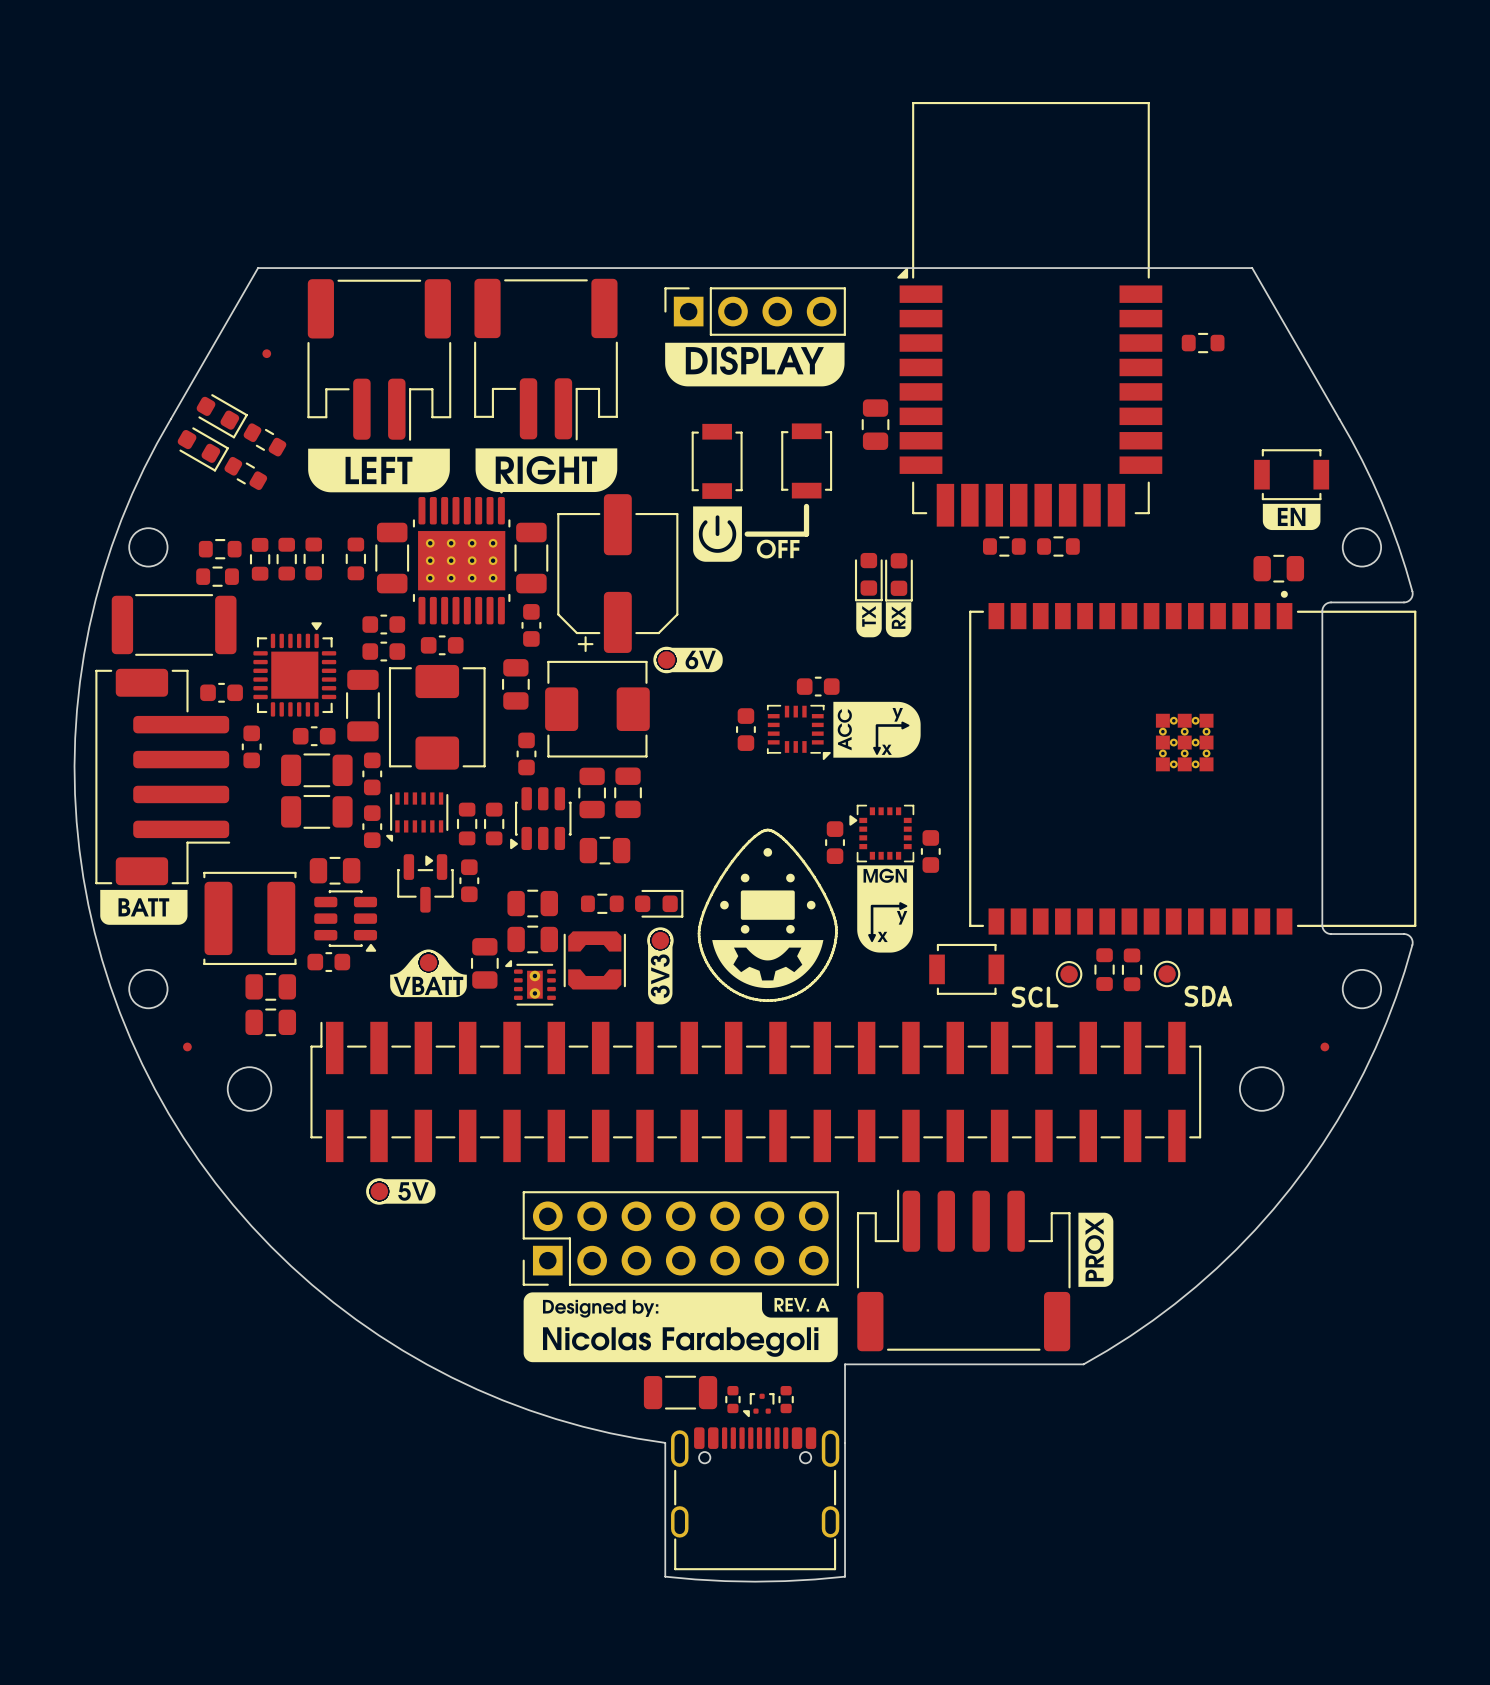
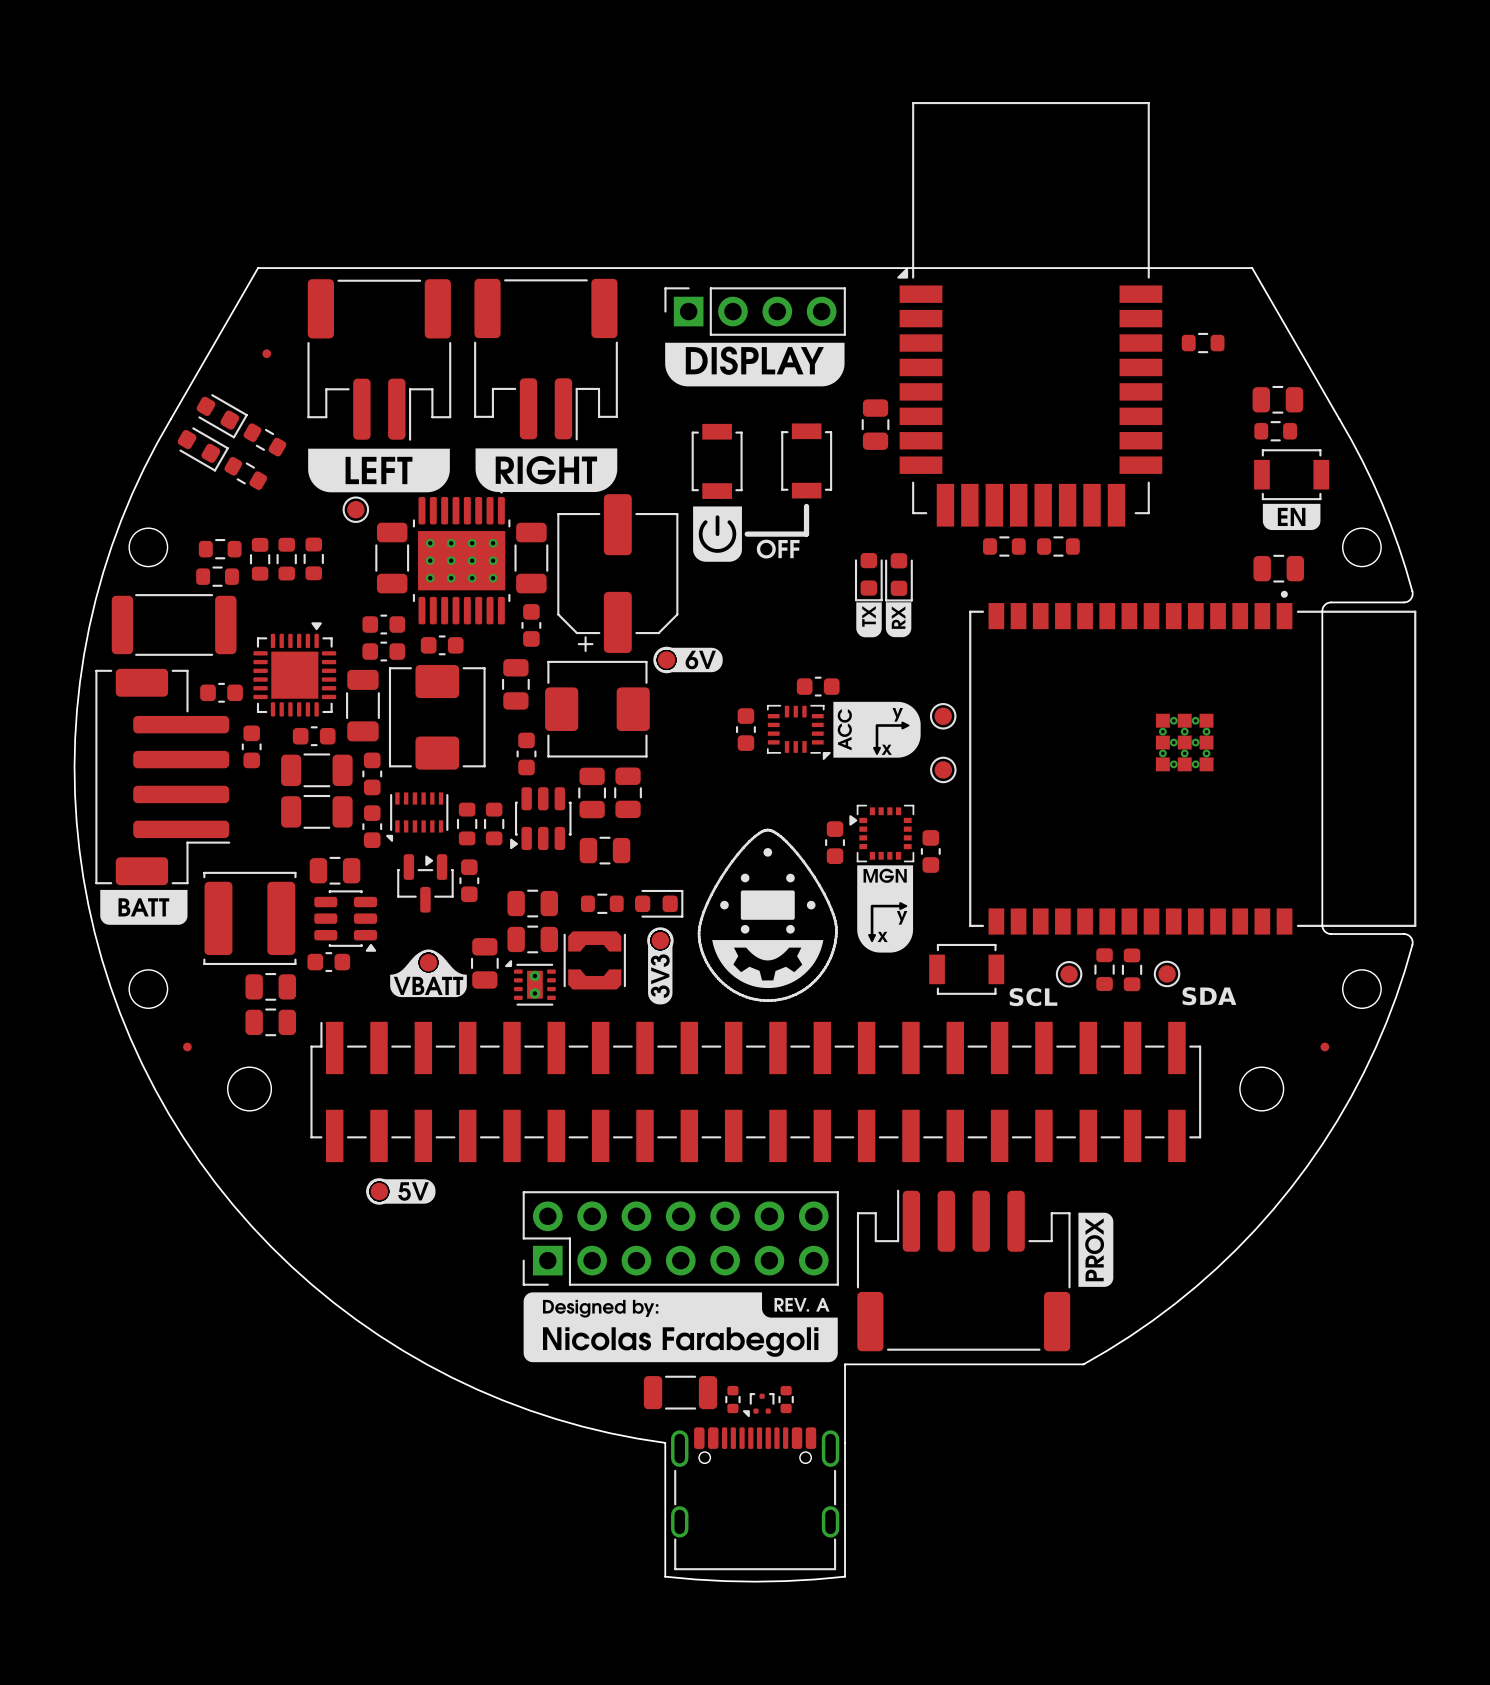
part: none -> (1277, 399)
part: none -> (1275, 431)
part: none -> (355, 509)
part: (355, 558) -> none
part: none -> (943, 716)
part: none -> (943, 769)

